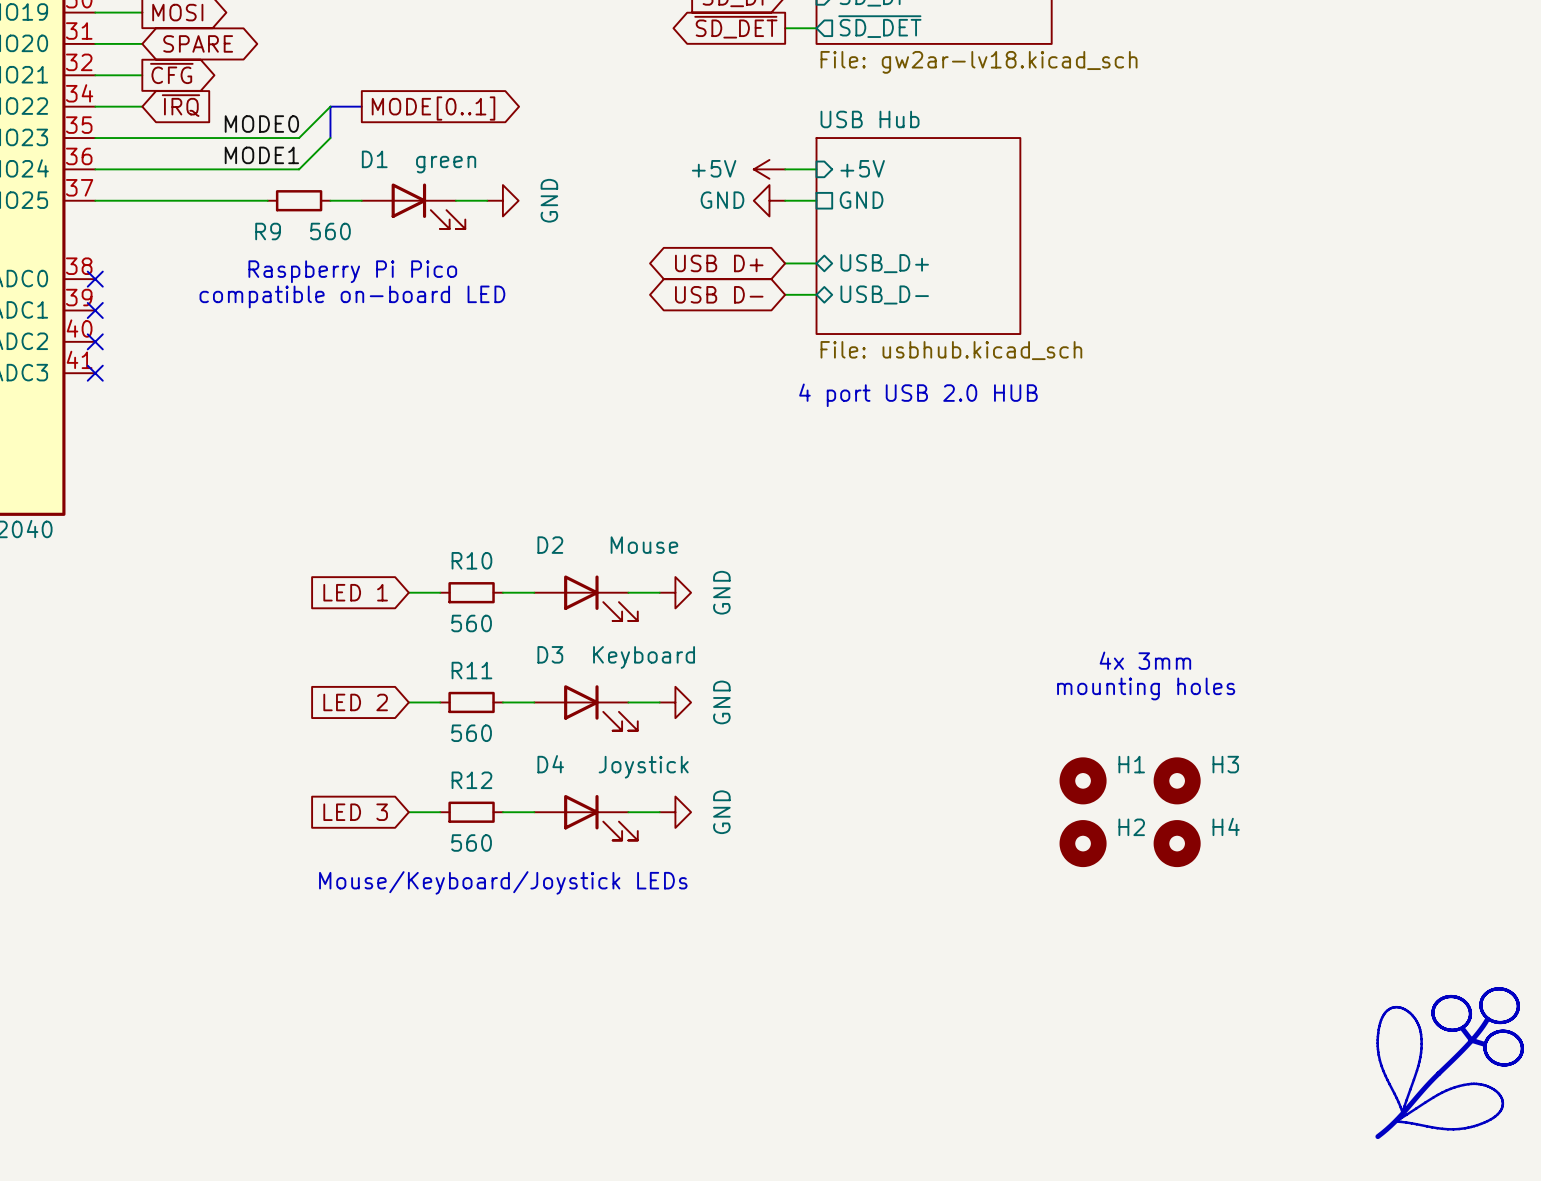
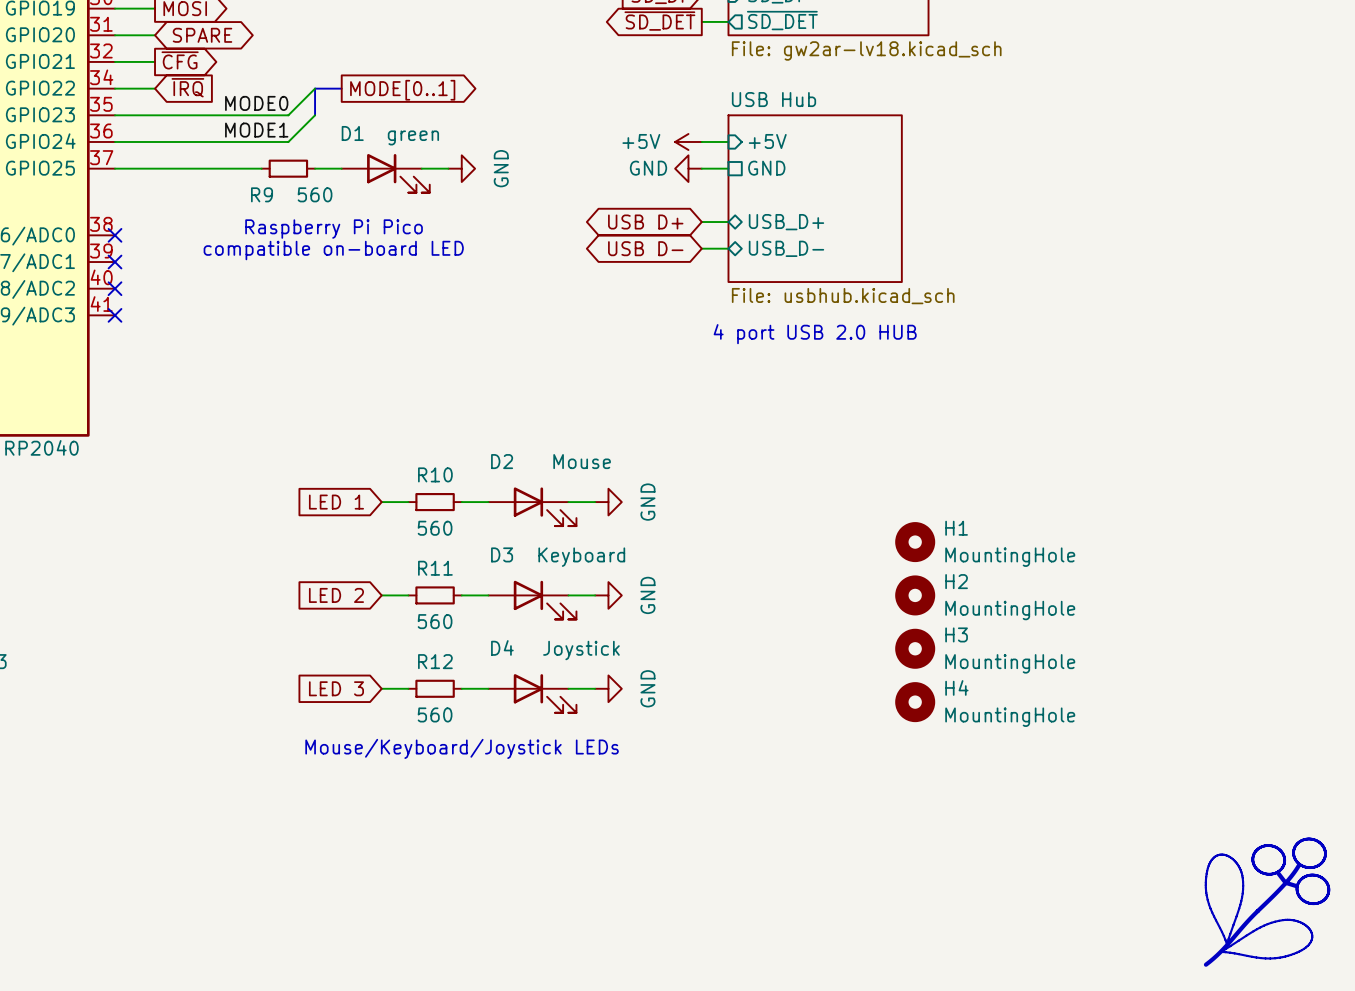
H1 value: none -> MountingHole (1010, 557)
text: 4x 3mm (1145, 660) -> none
text: mounting holes (1146, 688) -> none
H2 value: none -> MountingHole (1010, 610)
H1 position: (1083, 780) -> (915, 542)
H3 position: (1177, 780) -> (915, 648)
H3 value: none -> MountingHole (1010, 663)
H2 position: (1083, 843) -> (915, 595)
H4 position: (1177, 843) -> (915, 702)
H4 value: none -> MountingHole (1010, 717)

